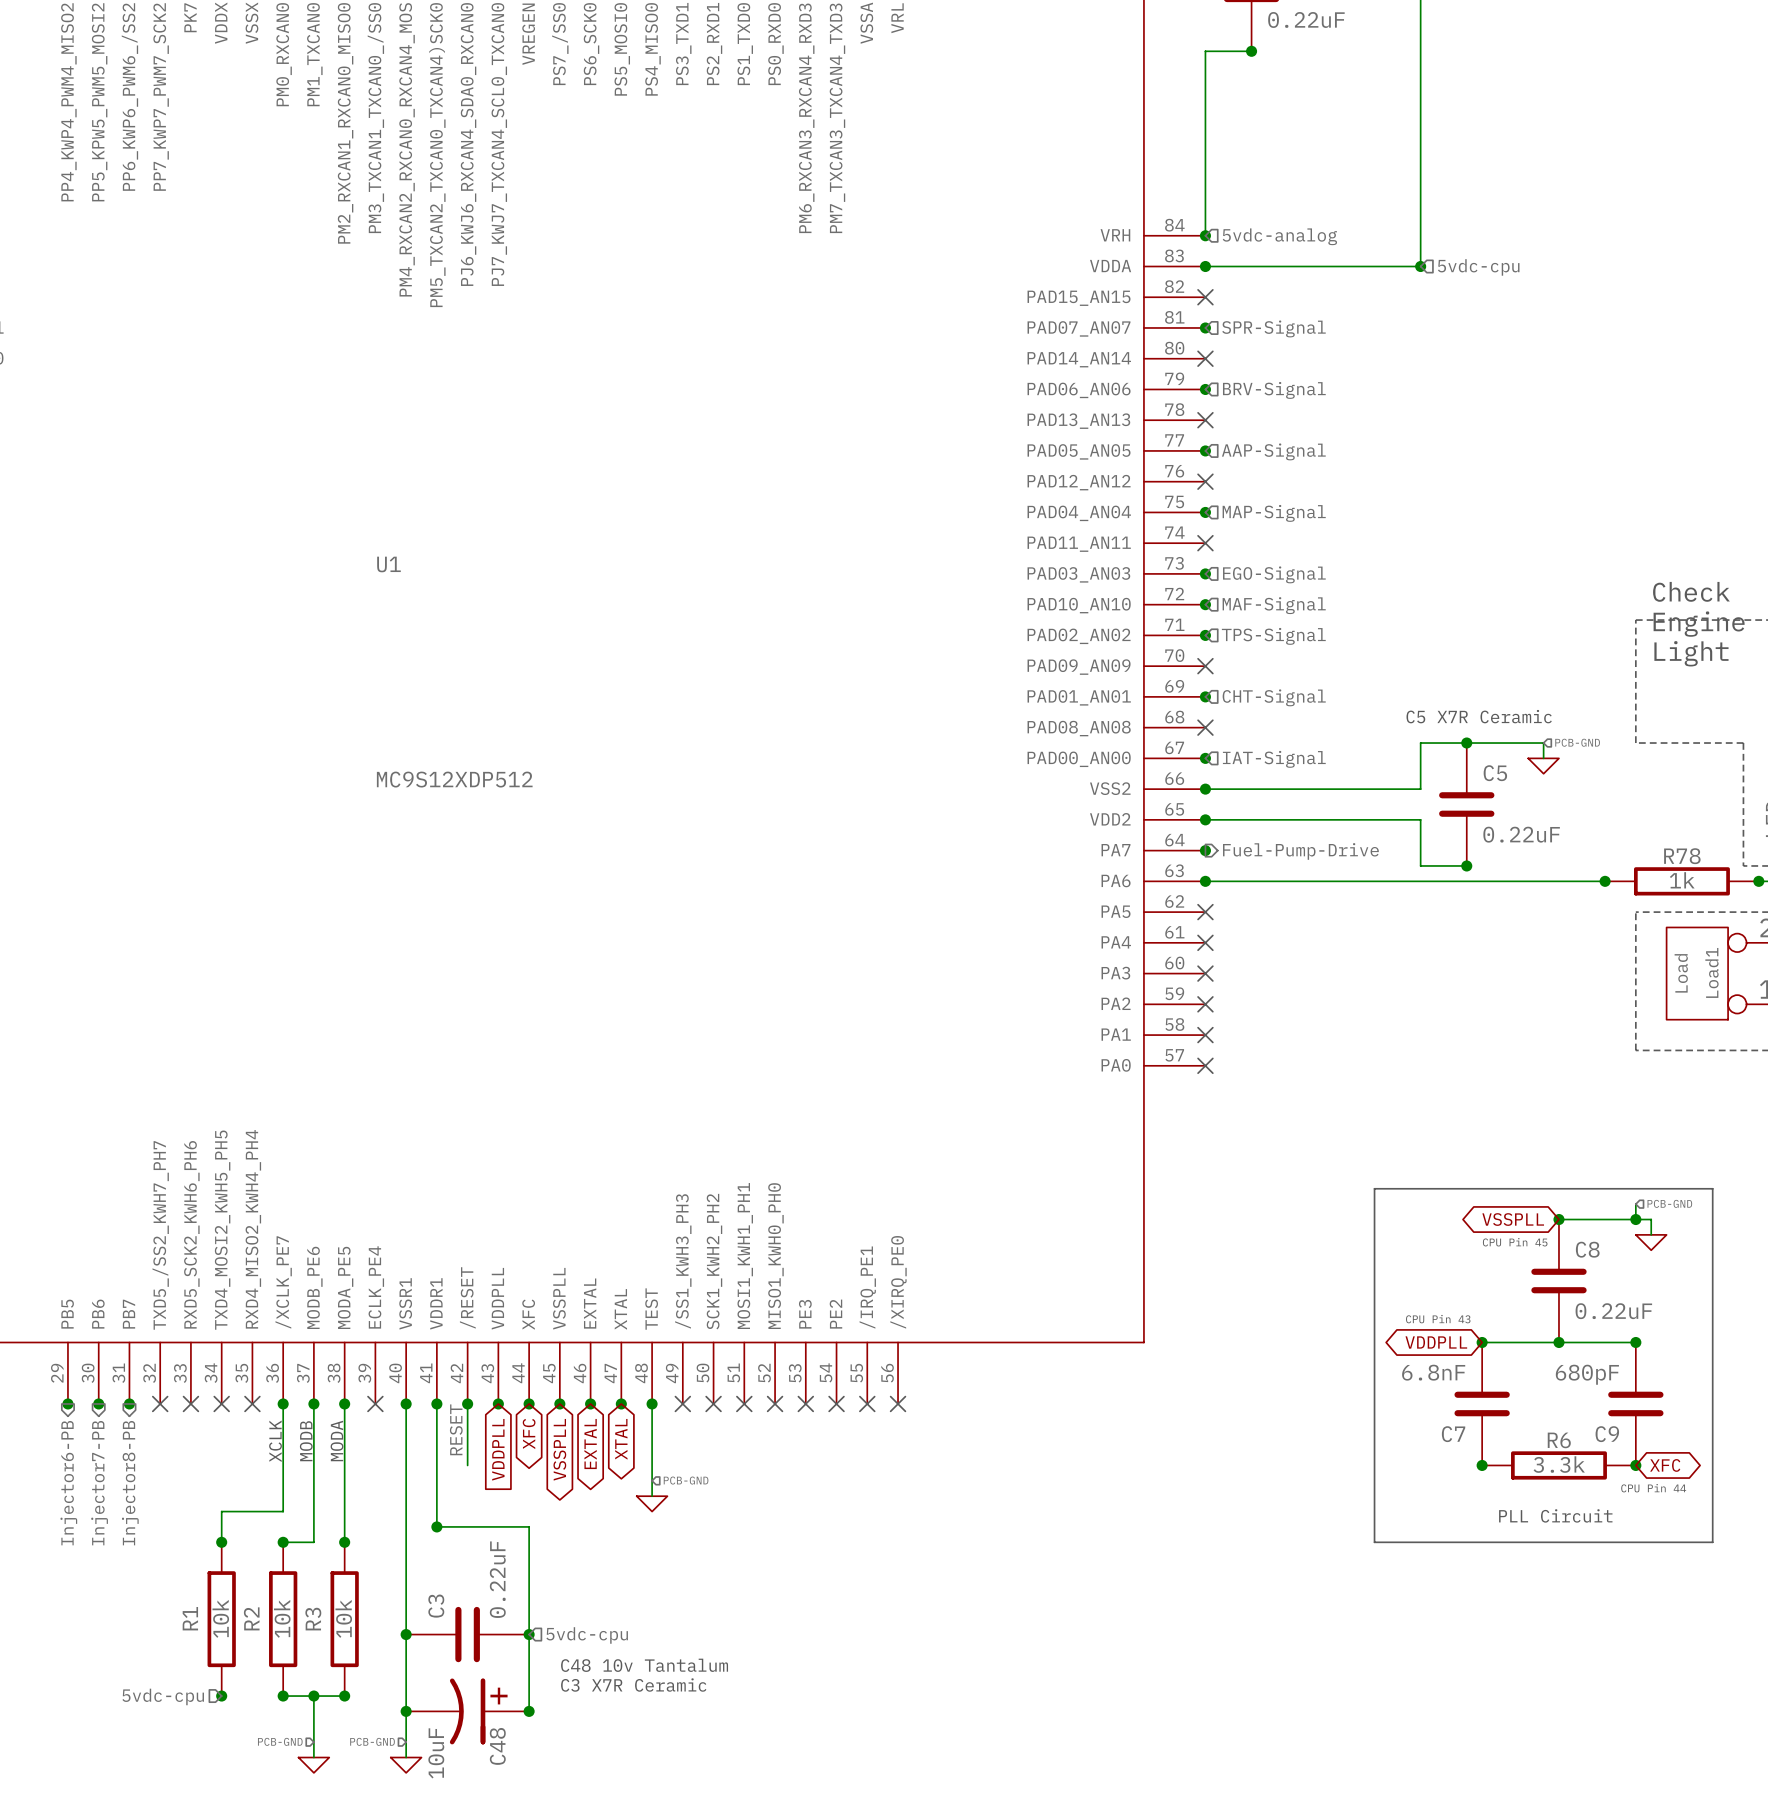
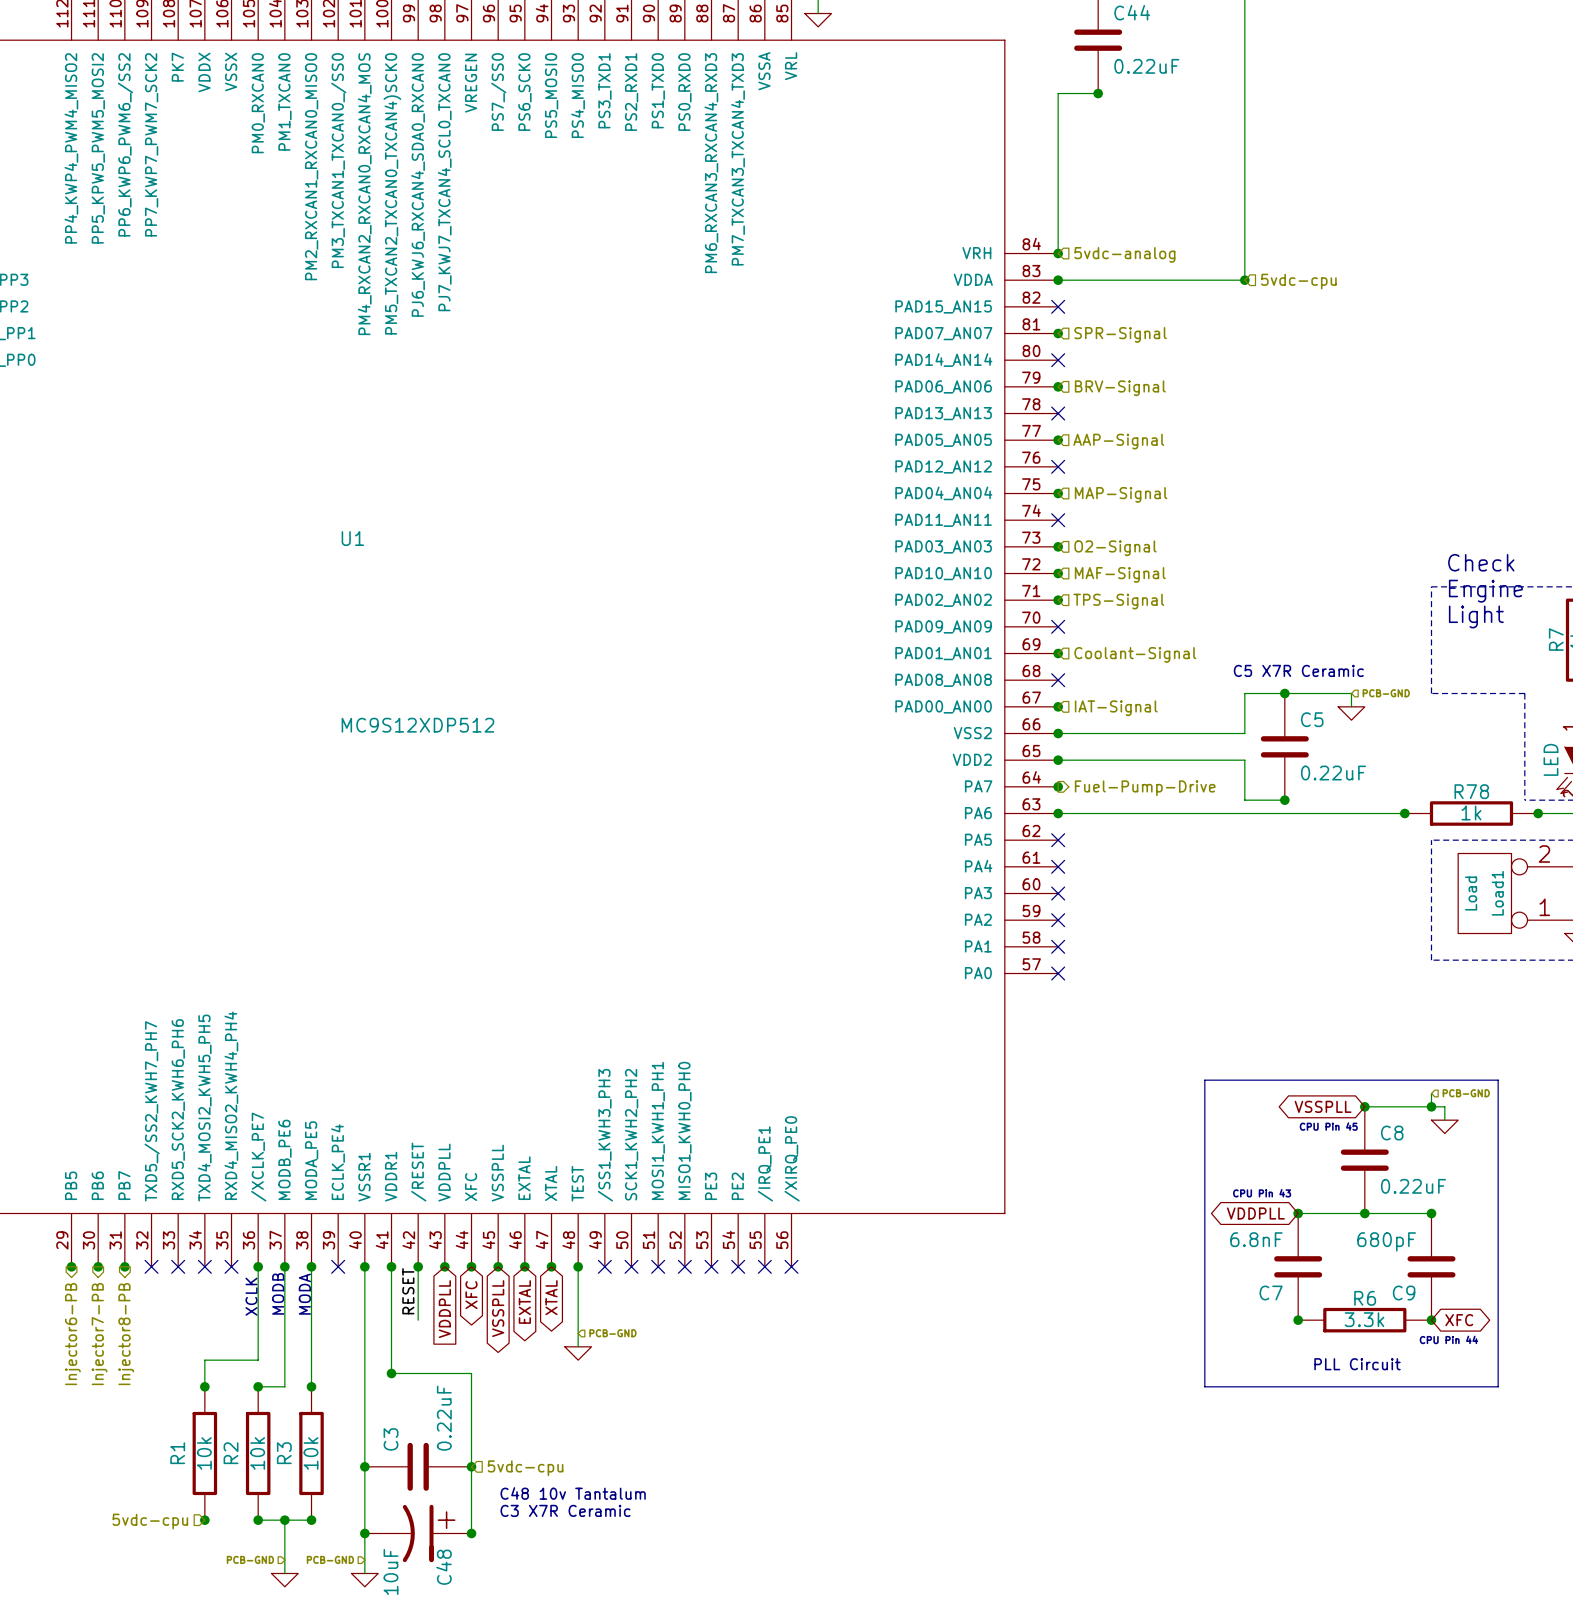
hierarchical label: EGO-Signal (1274, 574) -> O2-Signal (1115, 548)
hierarchical label: CHT-Signal (1274, 697) -> Coolant-Signal (1135, 654)

